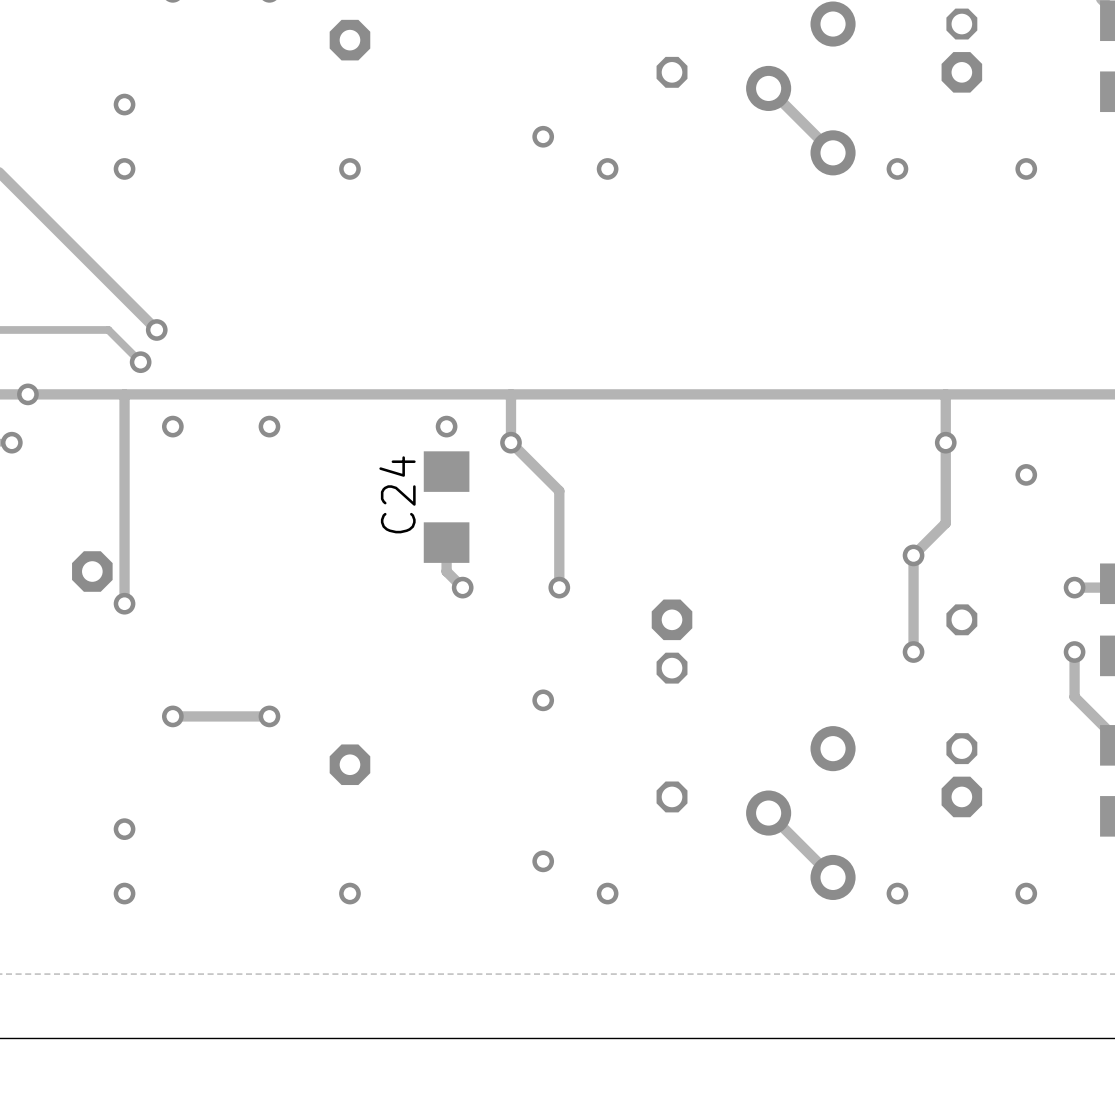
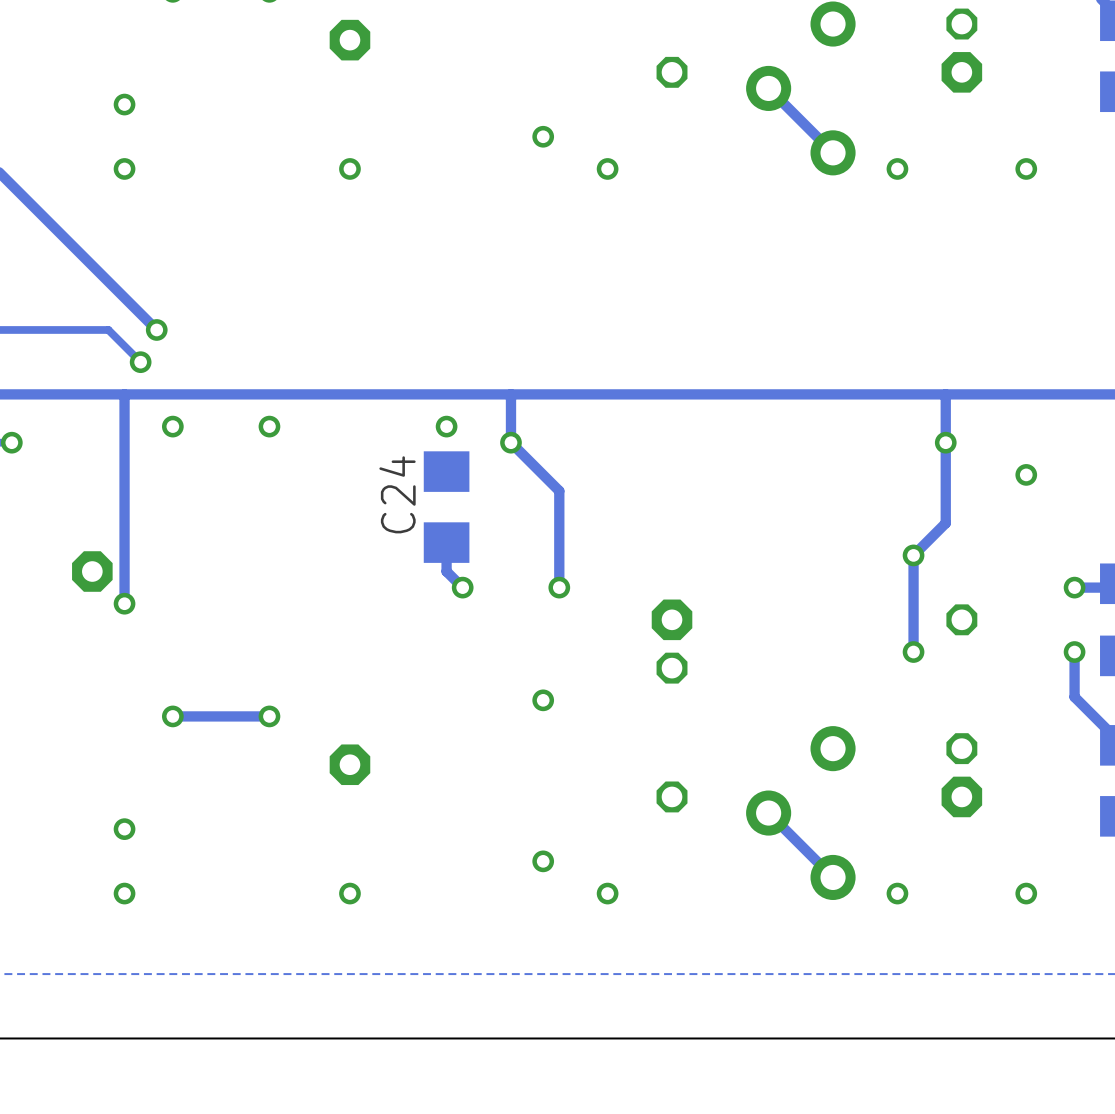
via: (27, 394) -> none

